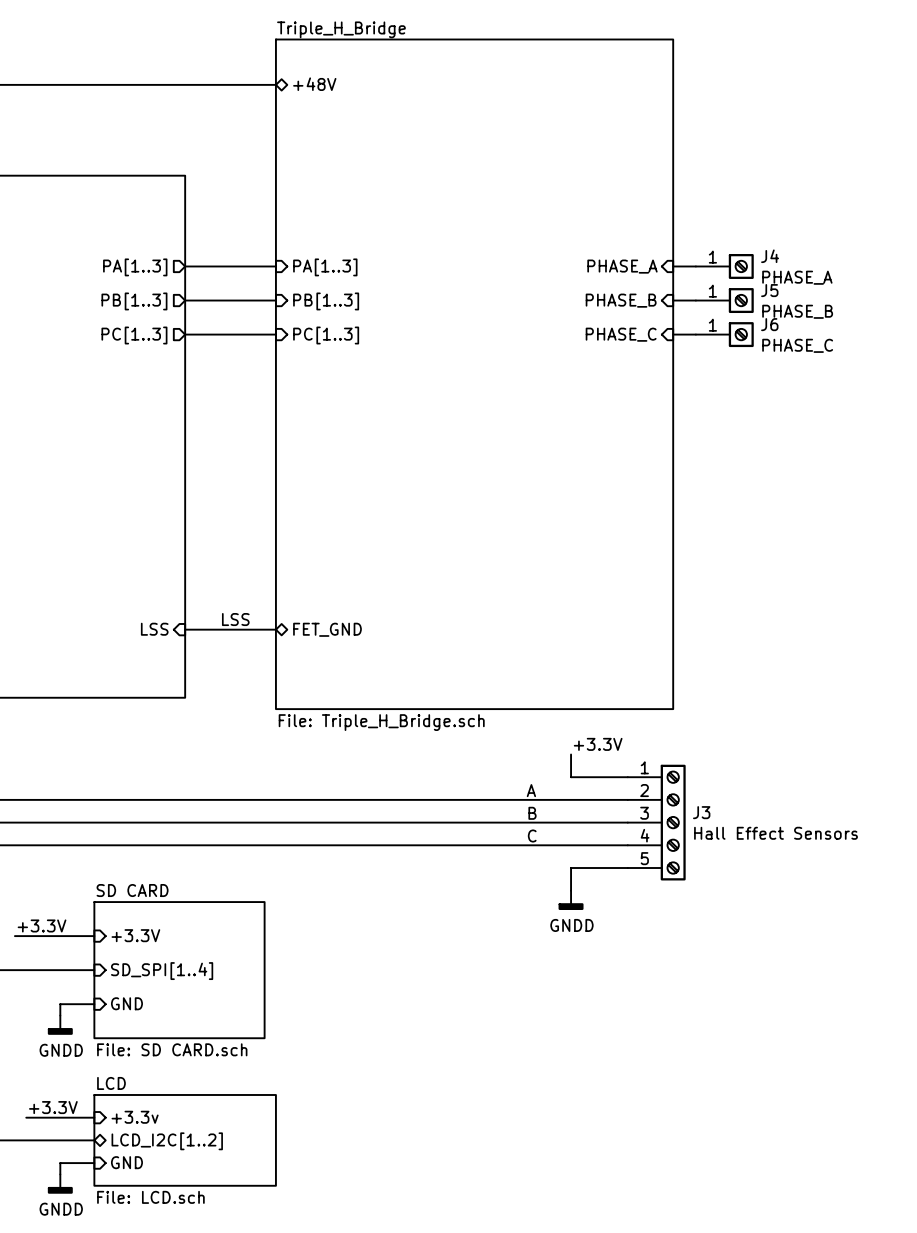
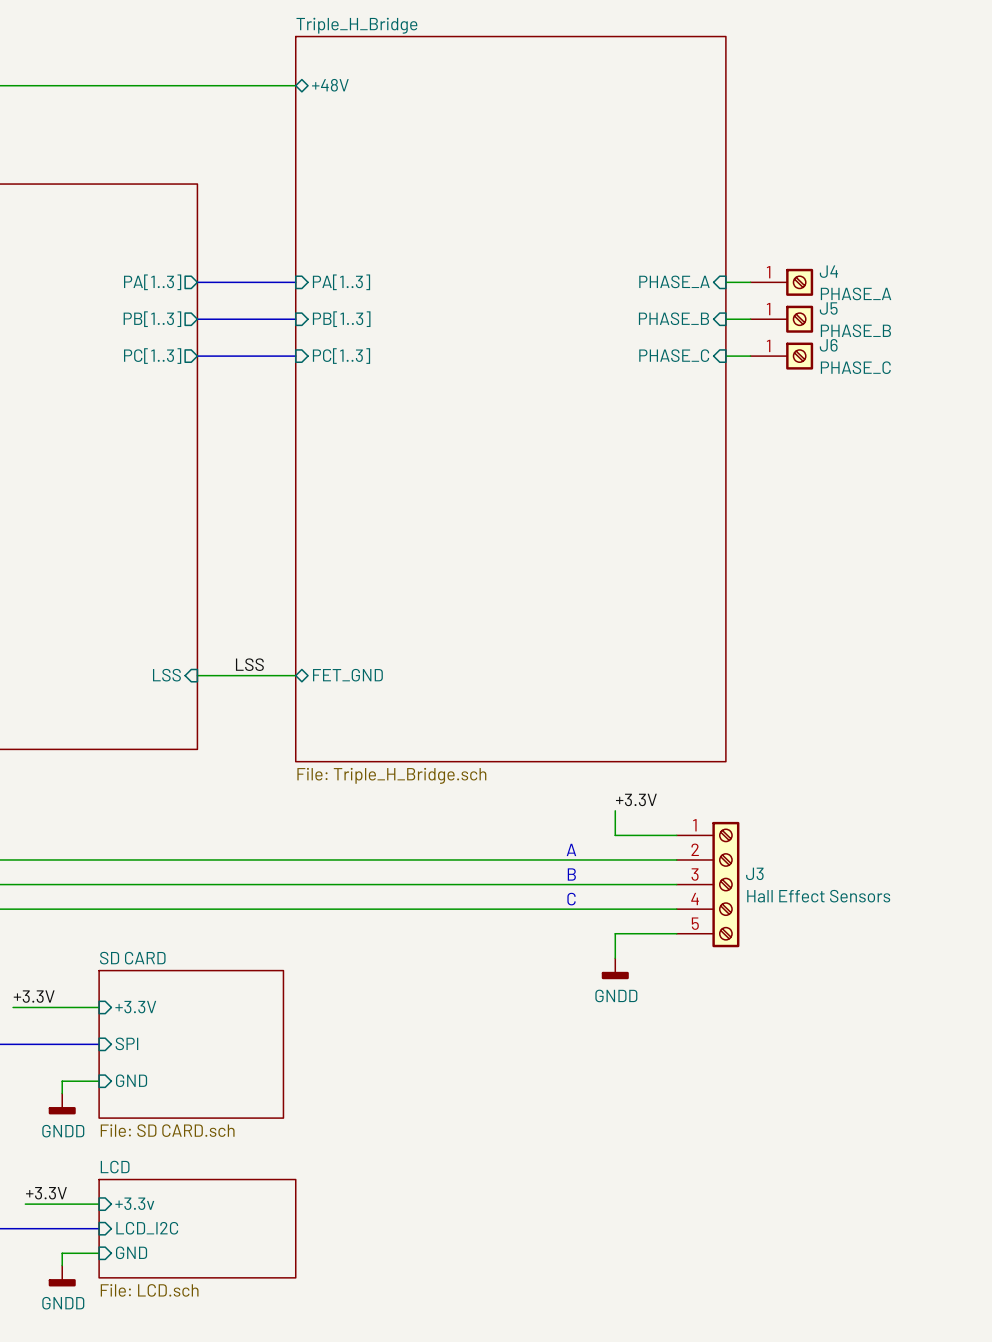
sheet pin: SD_SPI[1..4] (162, 971) -> SPI (126, 1043)
sheet pin shape: bidirectional (167, 1141) -> input (147, 1228)
sheet pin: LCD_I2C[1..2] (167, 1141) -> LCD_I2C (147, 1228)

